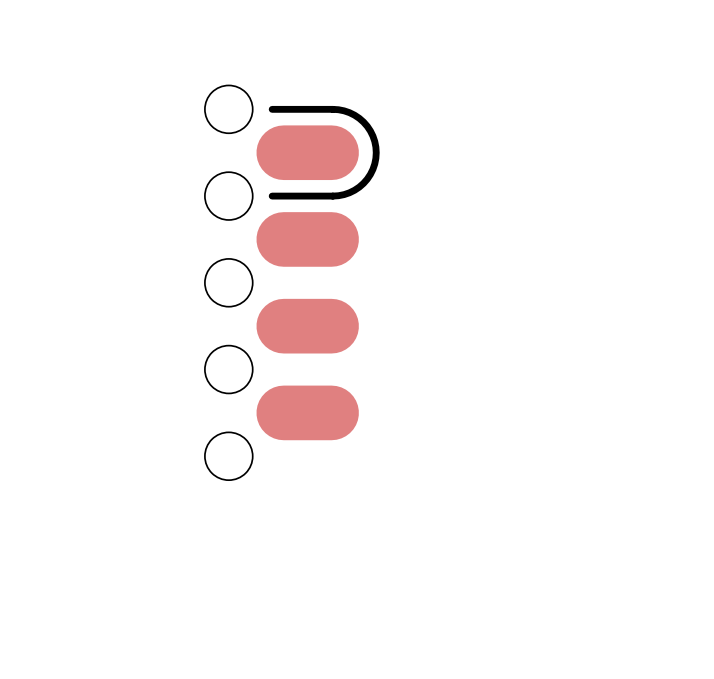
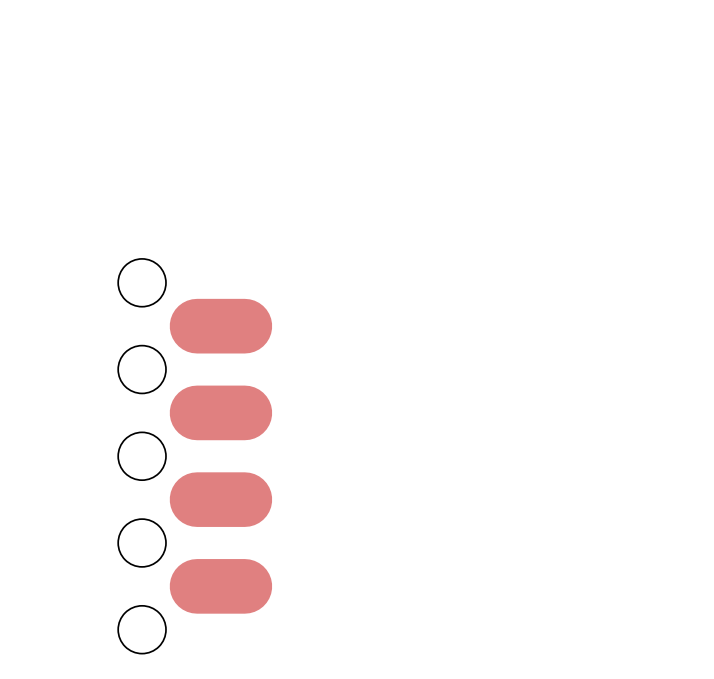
part side: top (292, 282) -> bottom (195, 456)

